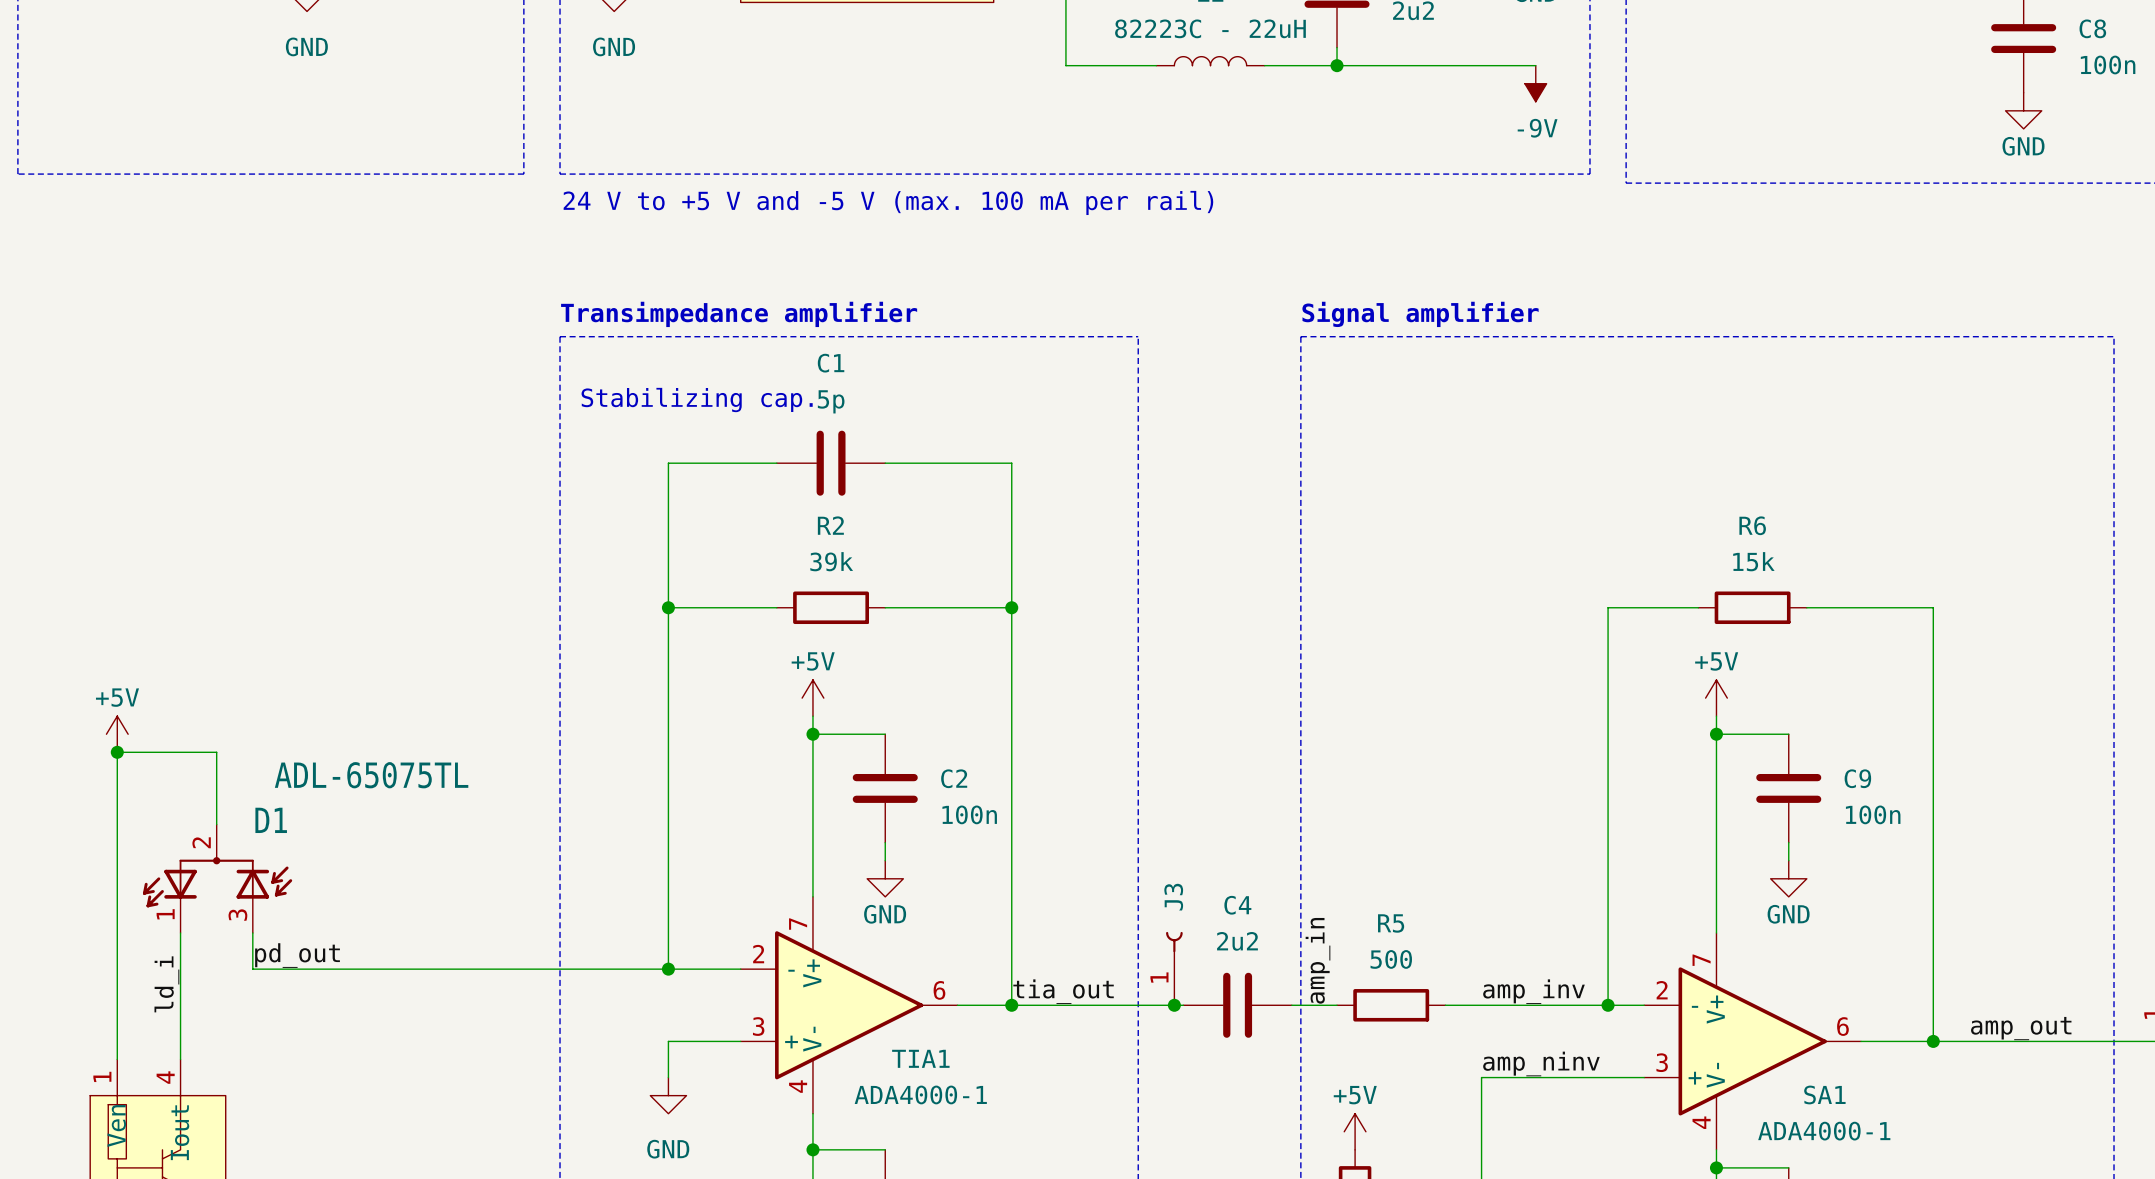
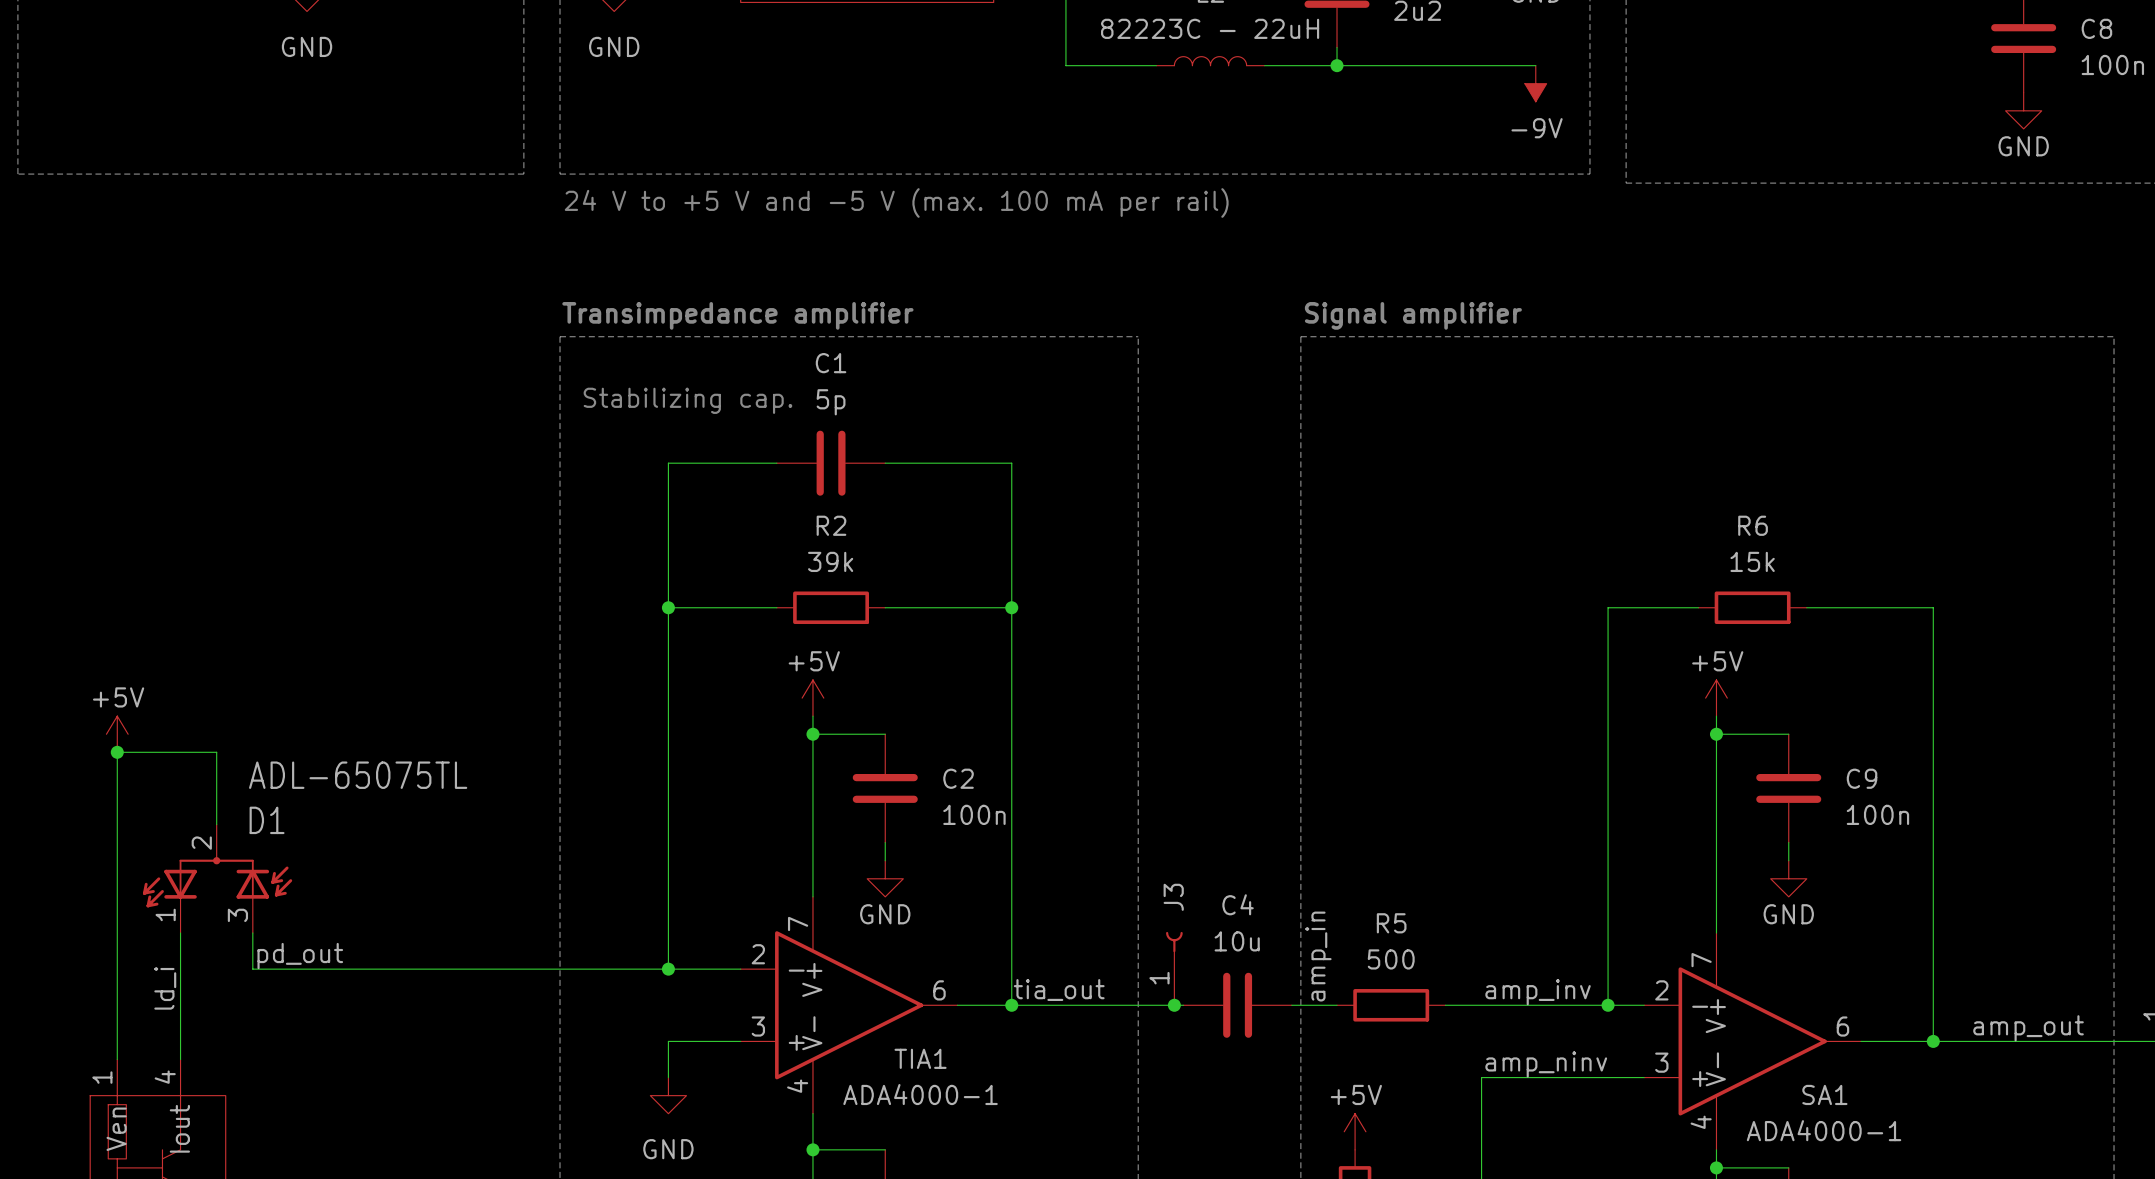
C4 value: 2u2 (1237, 941) -> 10u (1237, 941)

